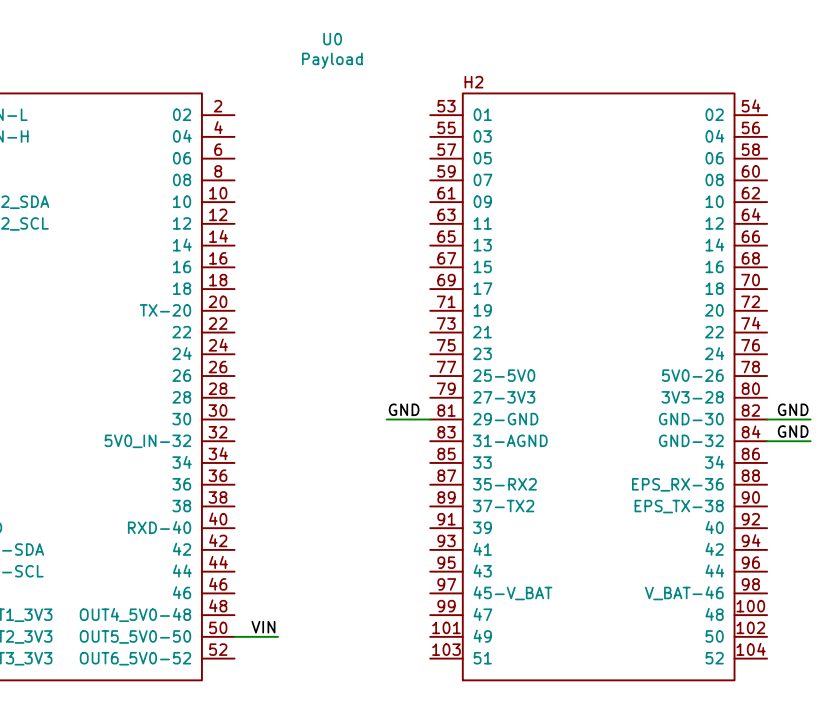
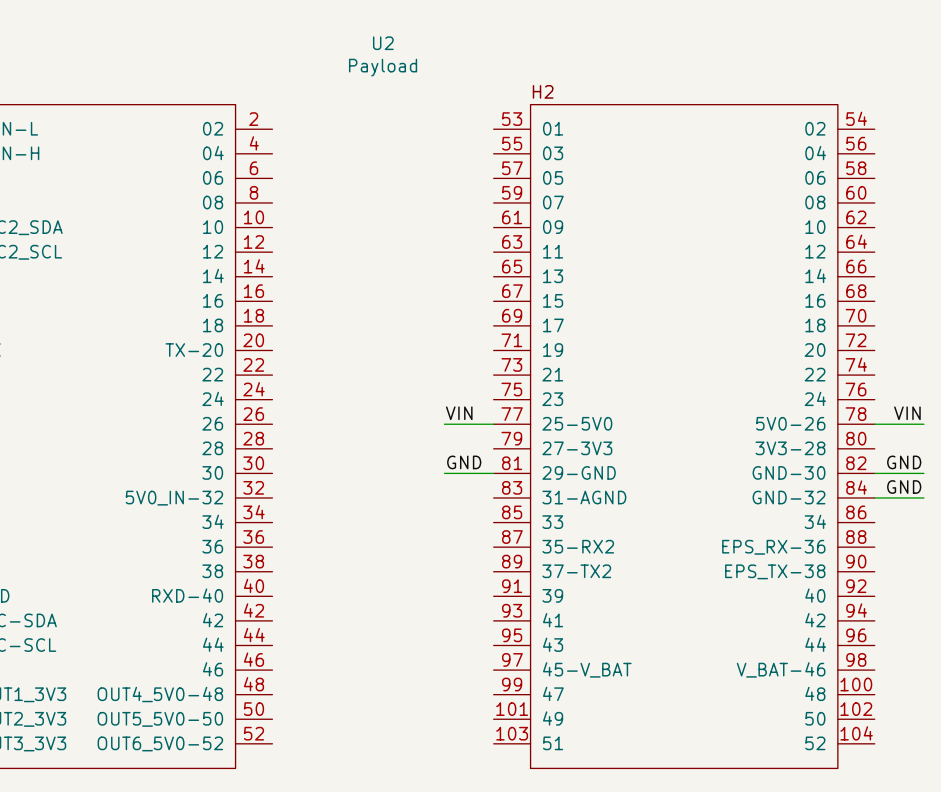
U0 name: U0 (332, 39) -> U2 (383, 43)
label: none -> VIN (459, 413)
label: none -> VIN (907, 413)
wire: none -> (444, 424) (493, 424)
wire: none -> (874, 424) (923, 424)
label: VIN (263, 627) -> none
wire: (234, 636) (278, 636) -> none

